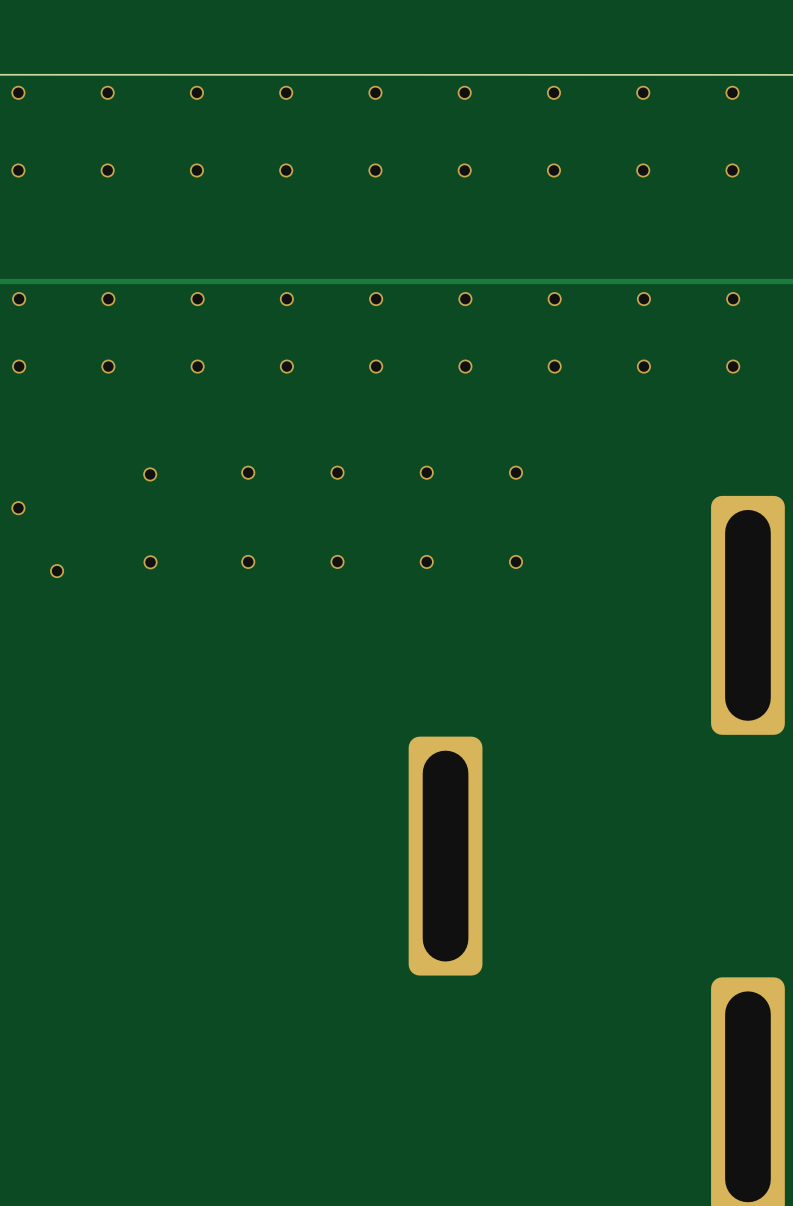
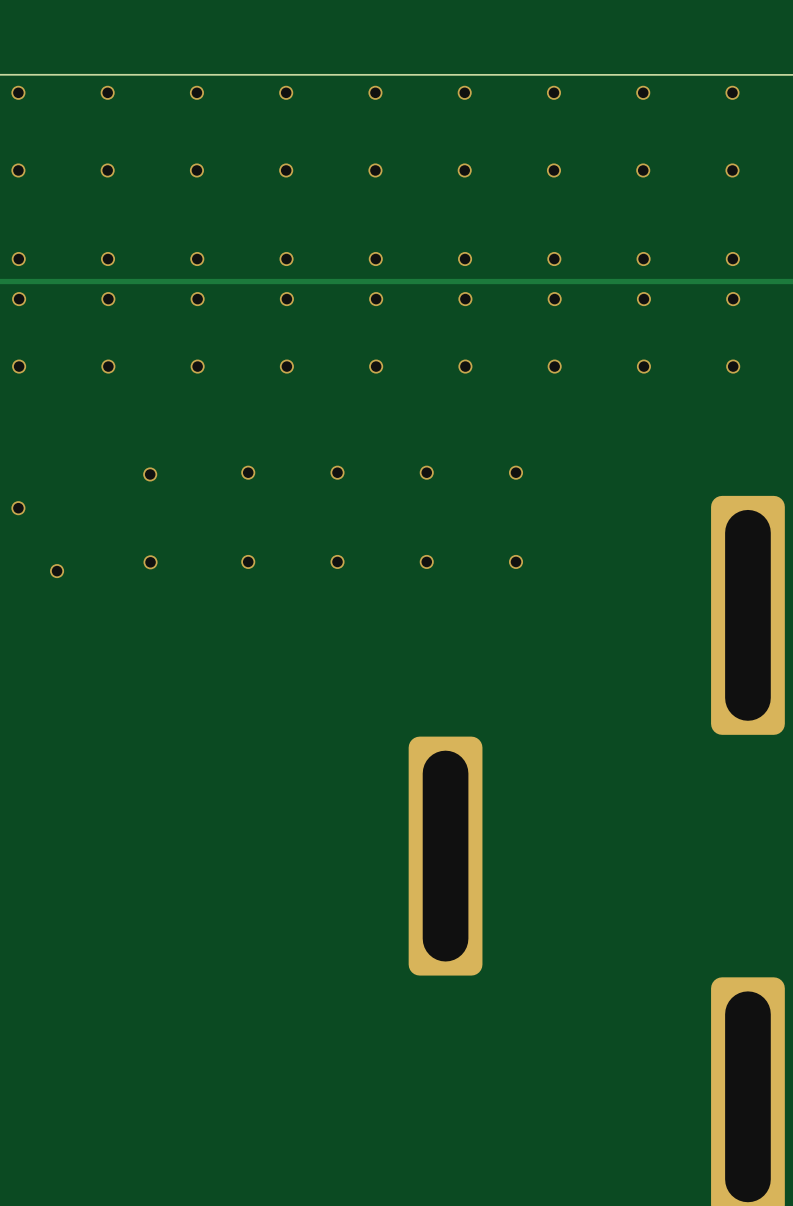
via: none -> (18, 259)
via: none -> (108, 259)
via: none -> (197, 259)
via: none -> (286, 259)
via: none -> (375, 259)
via: none -> (465, 259)
via: none -> (554, 259)
via: none -> (643, 259)
via: none -> (732, 259)

